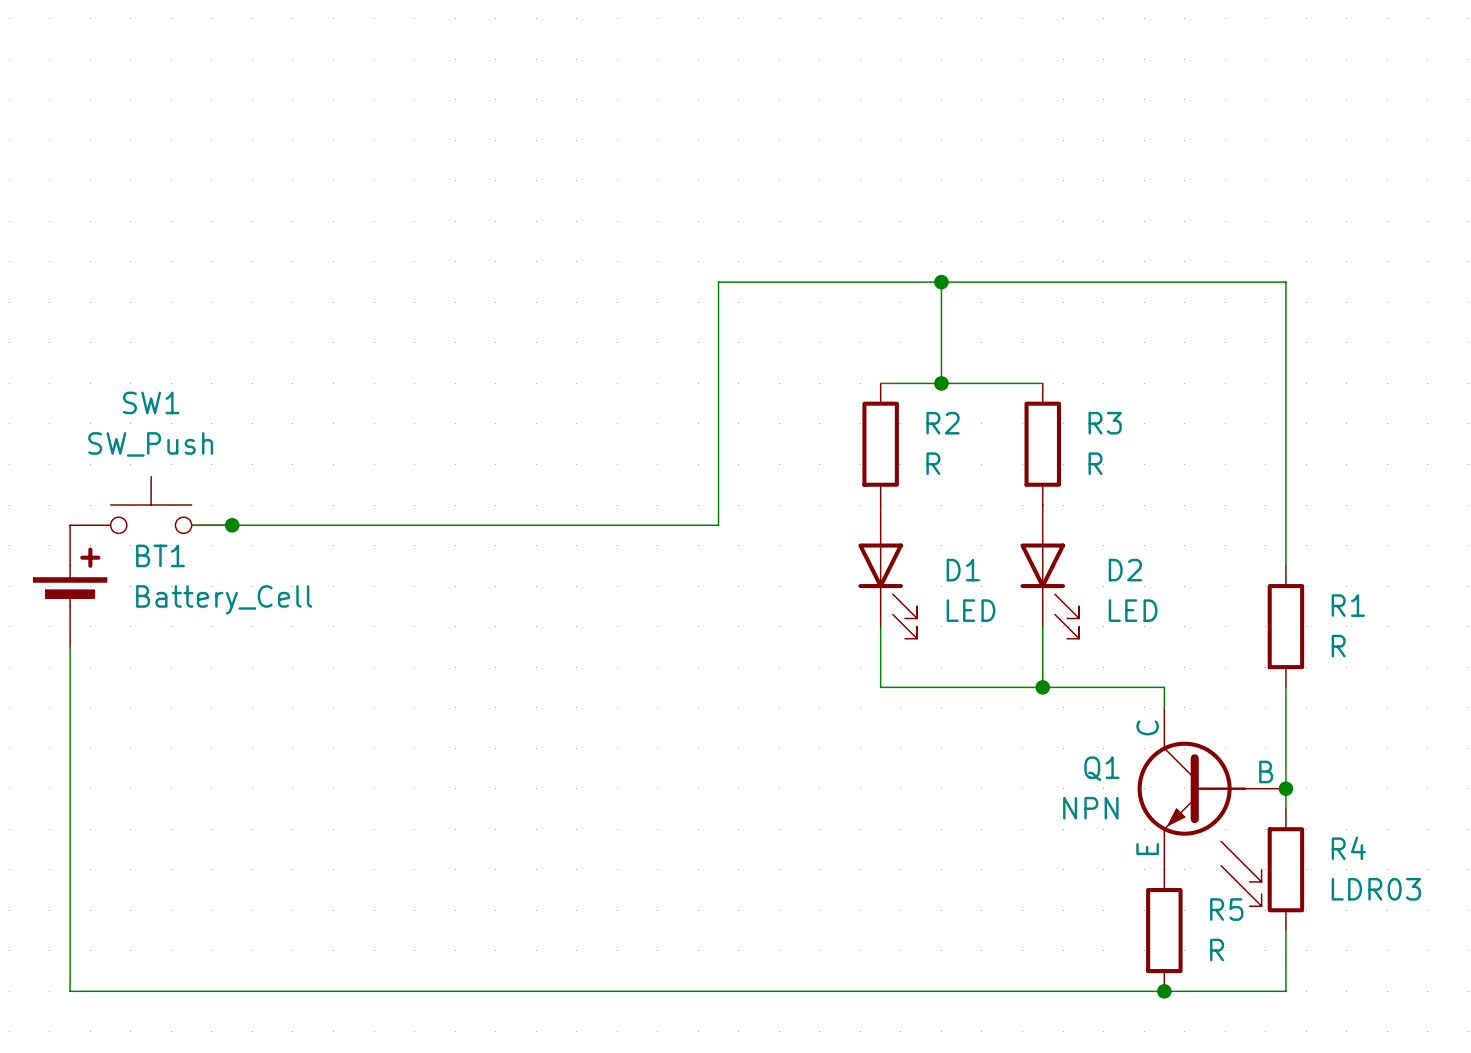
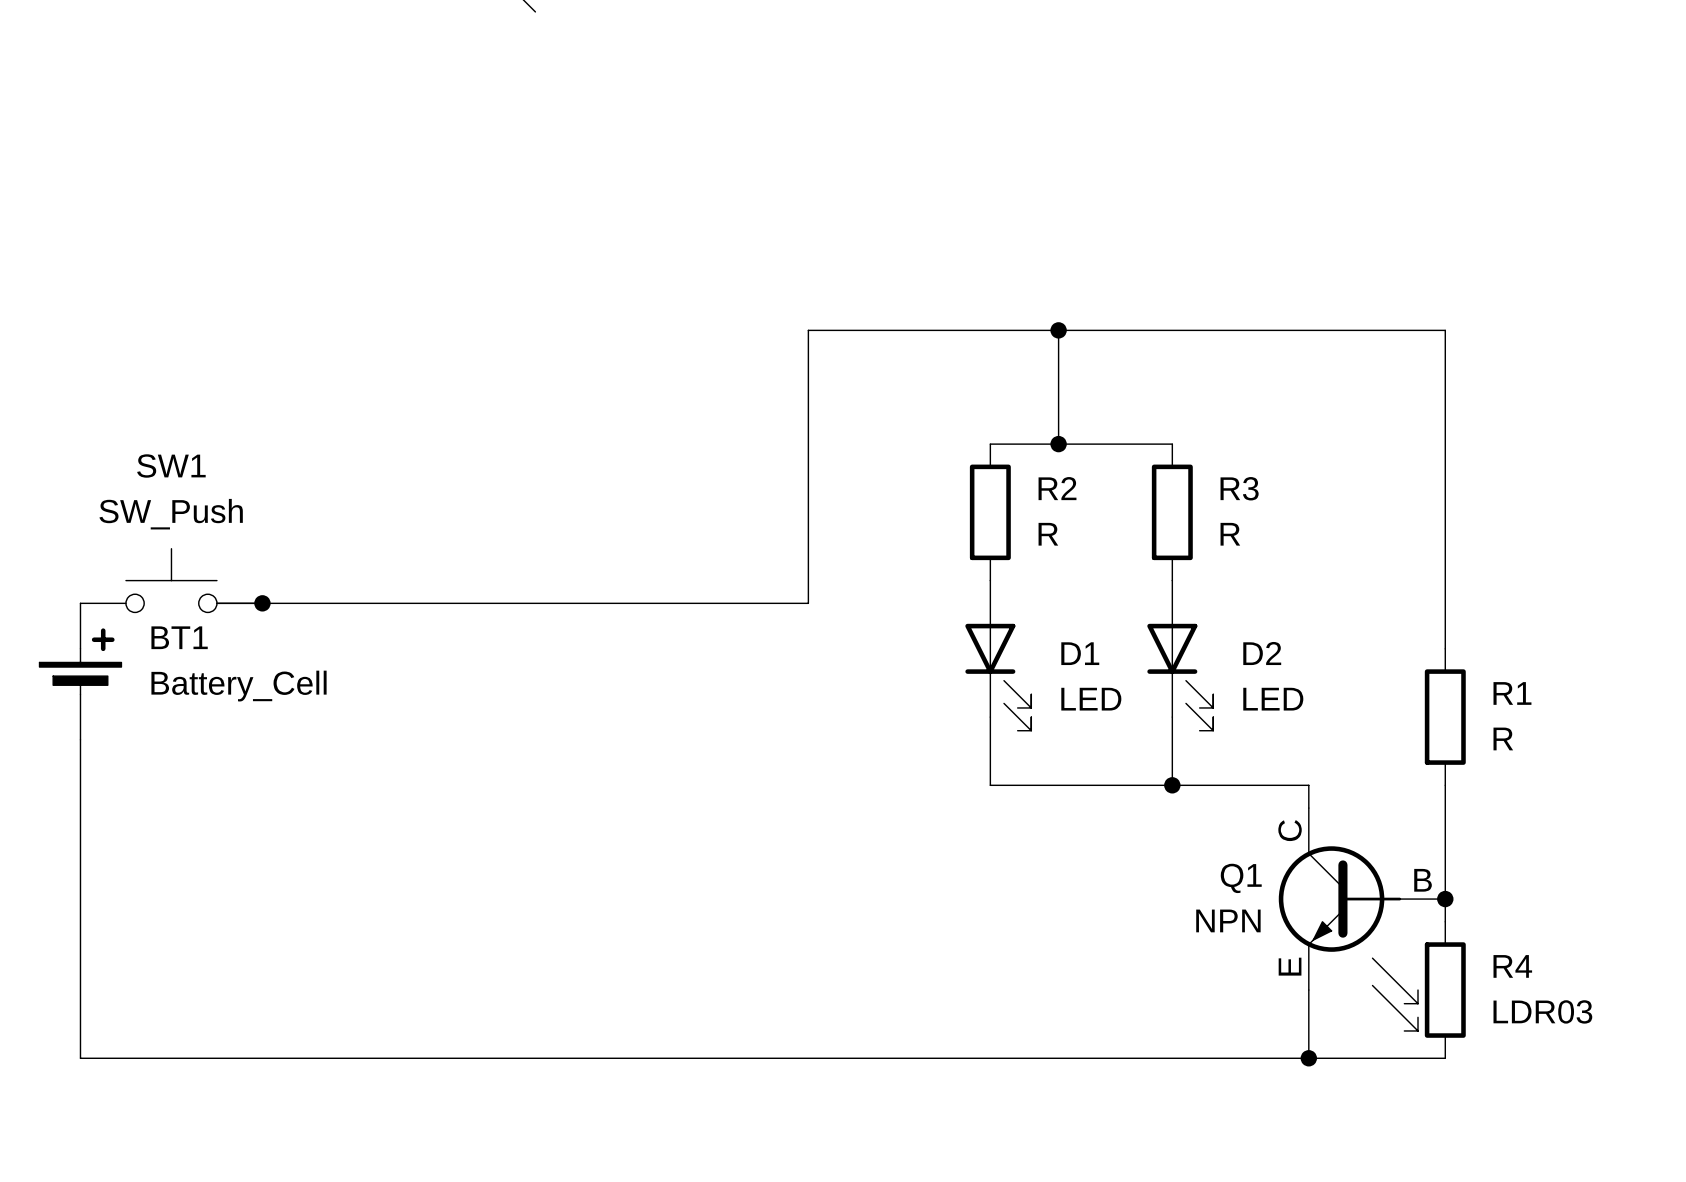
wire: none -> (1308, 990) (1308, 1058)
wire: (70, 930) (70, 991) (1285, 991) (1285, 930) -> (80, 1058) (1445, 1058)
R5: R (1164, 930) -> none
junction position: (1164, 991) -> (1308, 1058)

